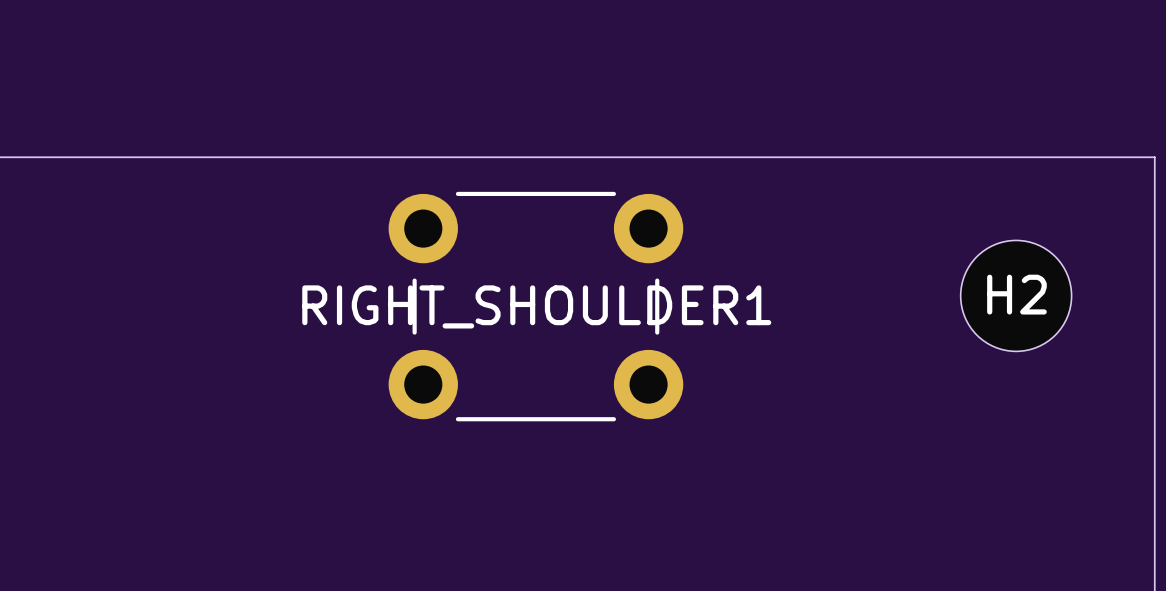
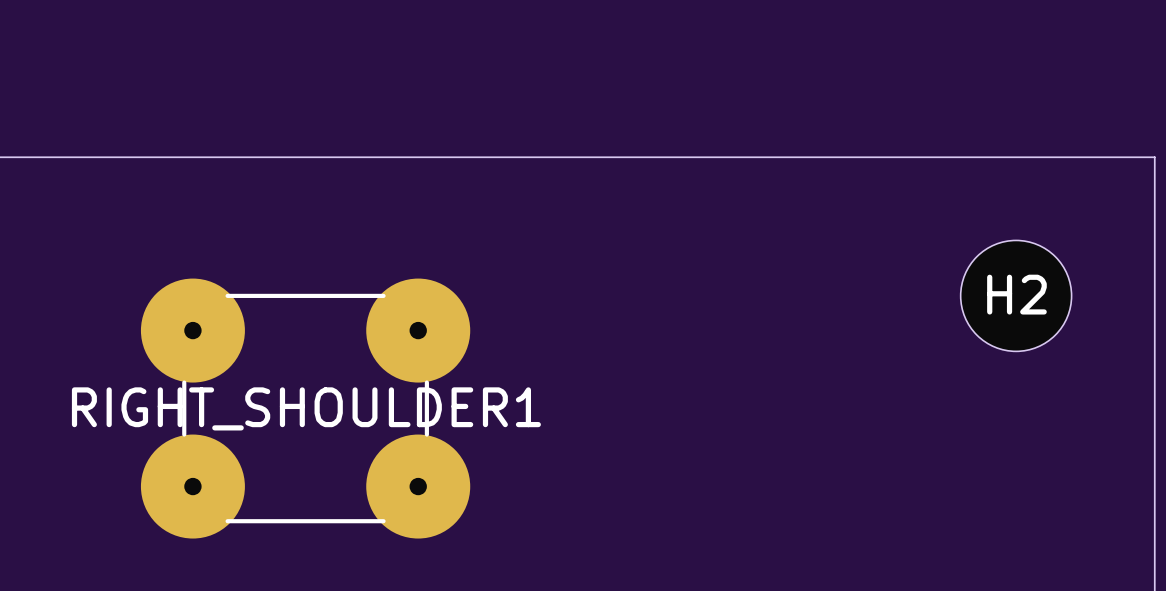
RIGHT_SHOULDER1 footprint: [388, 191, 684, 422] -> [140, 278, 471, 539]

